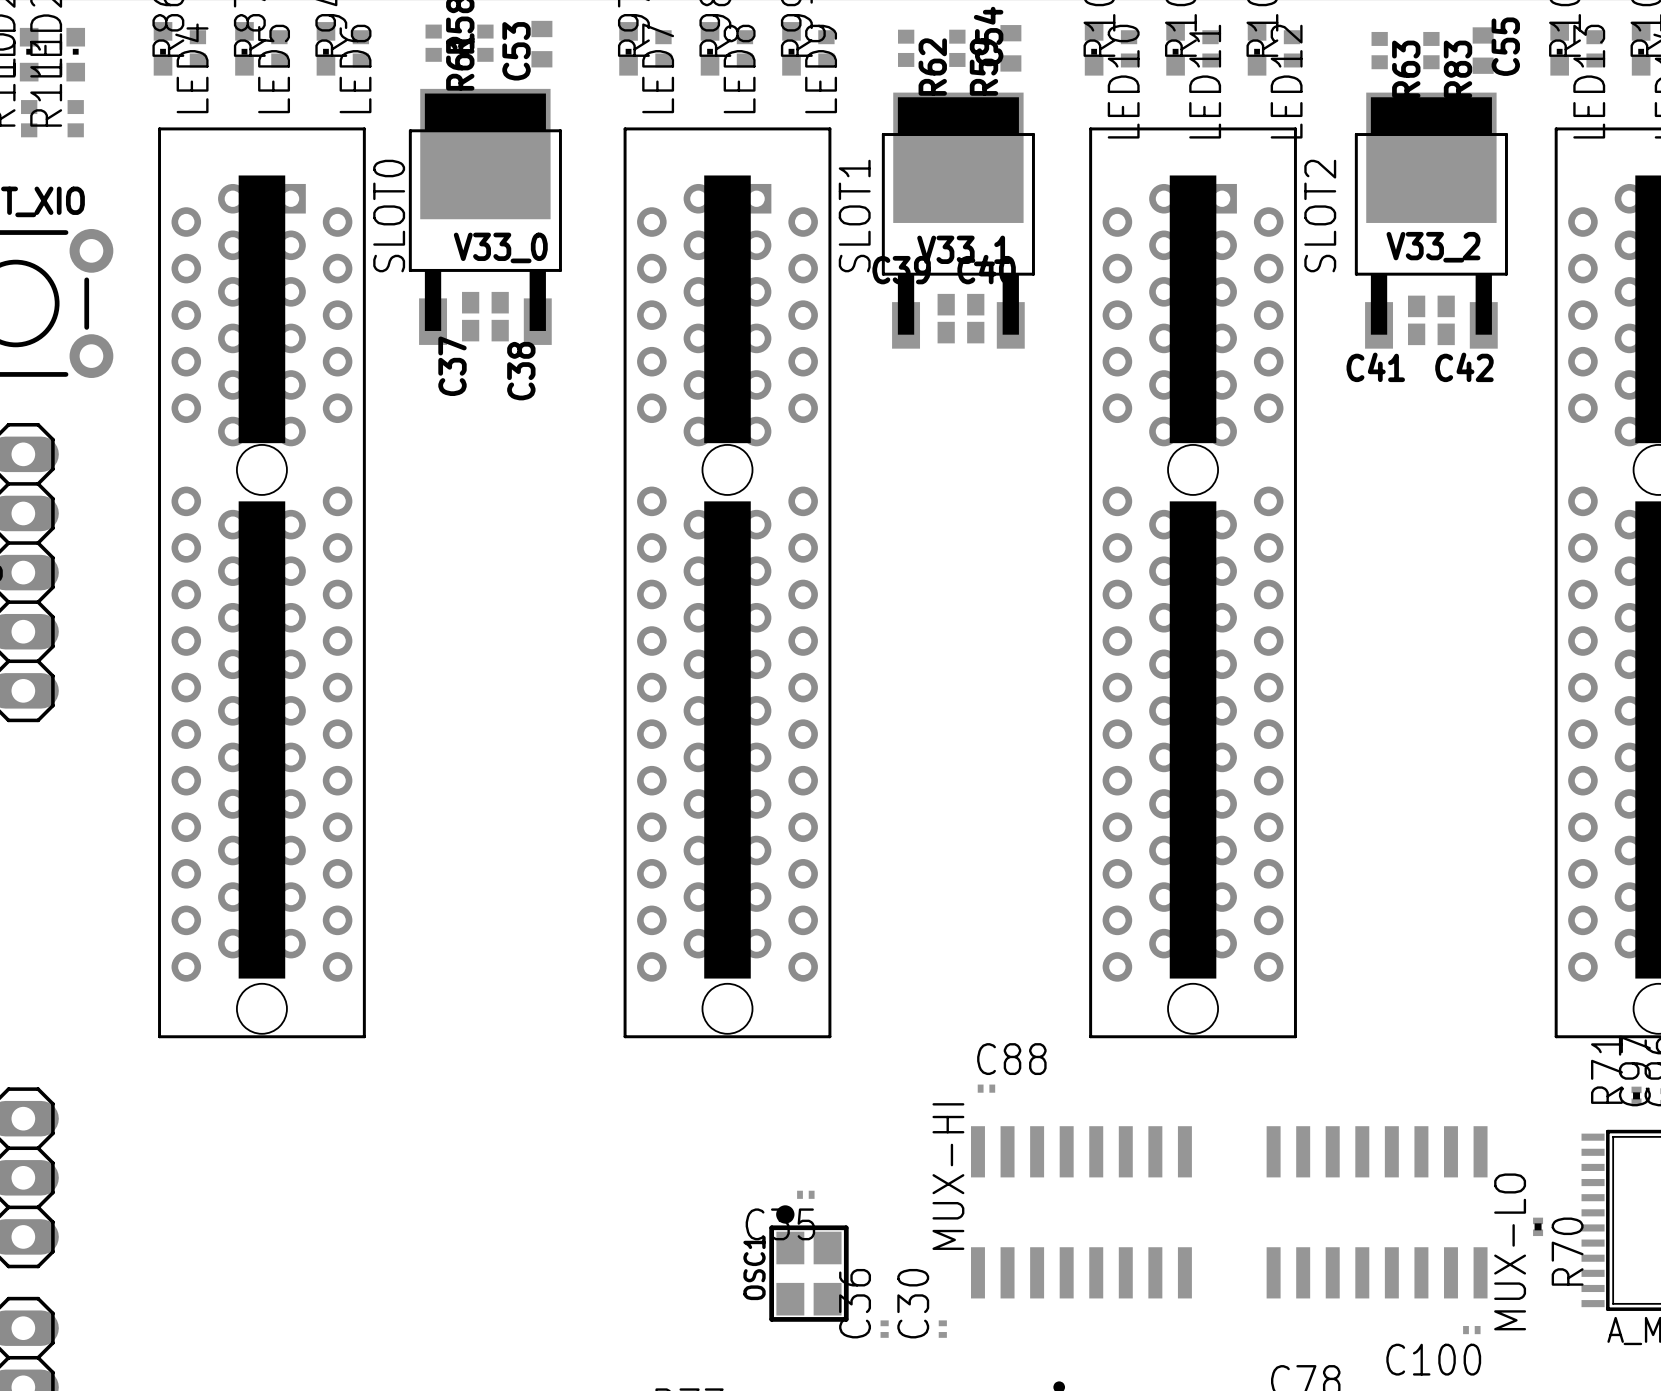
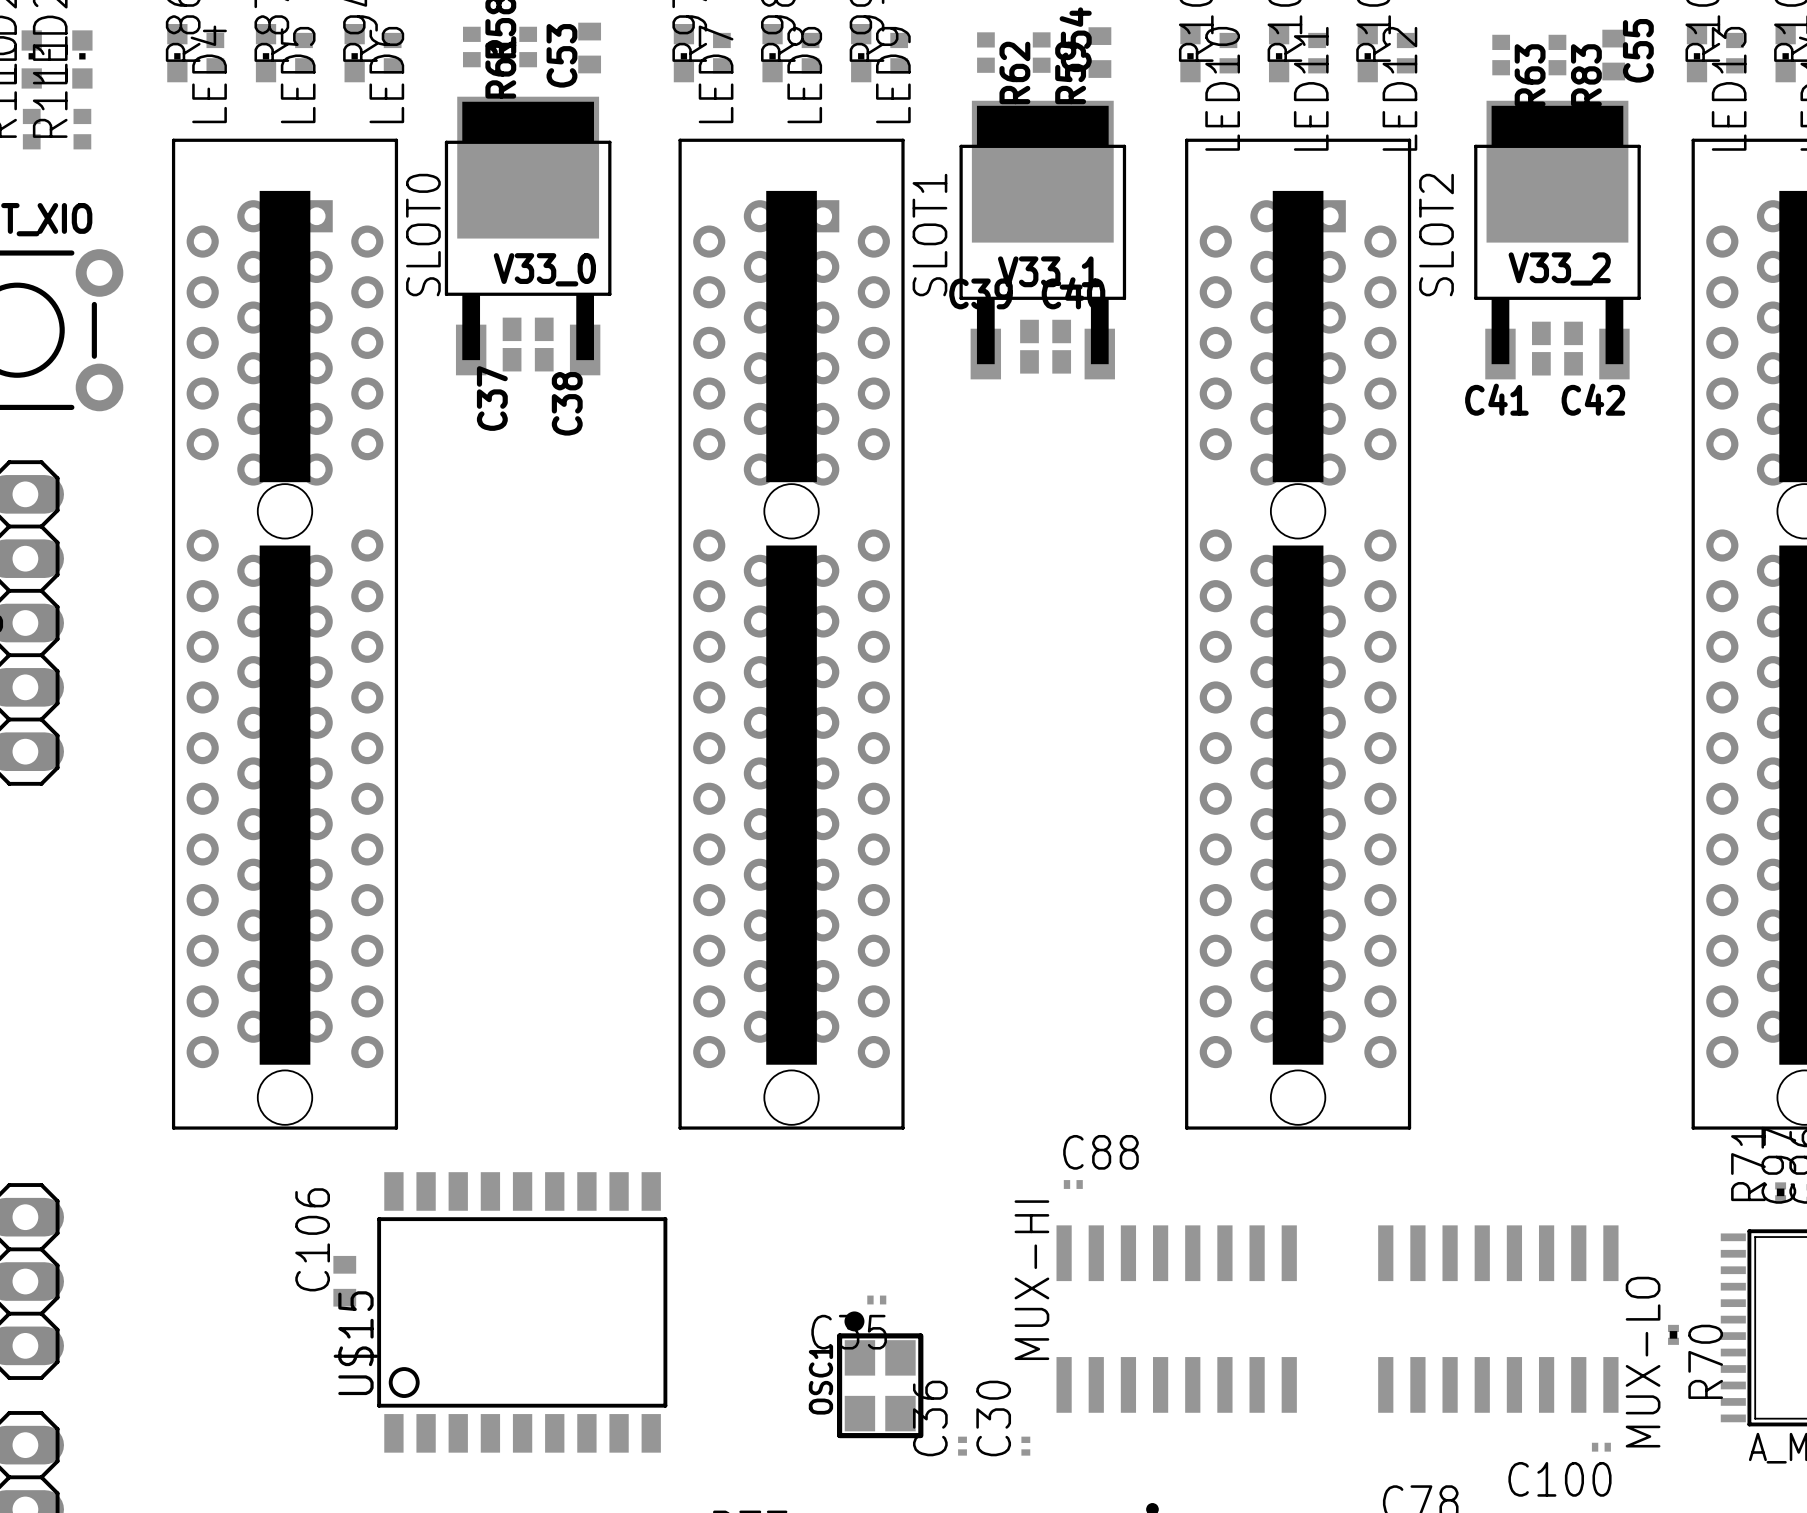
C106: none -> (344, 1281)
U$15: none -> (522, 1312)

